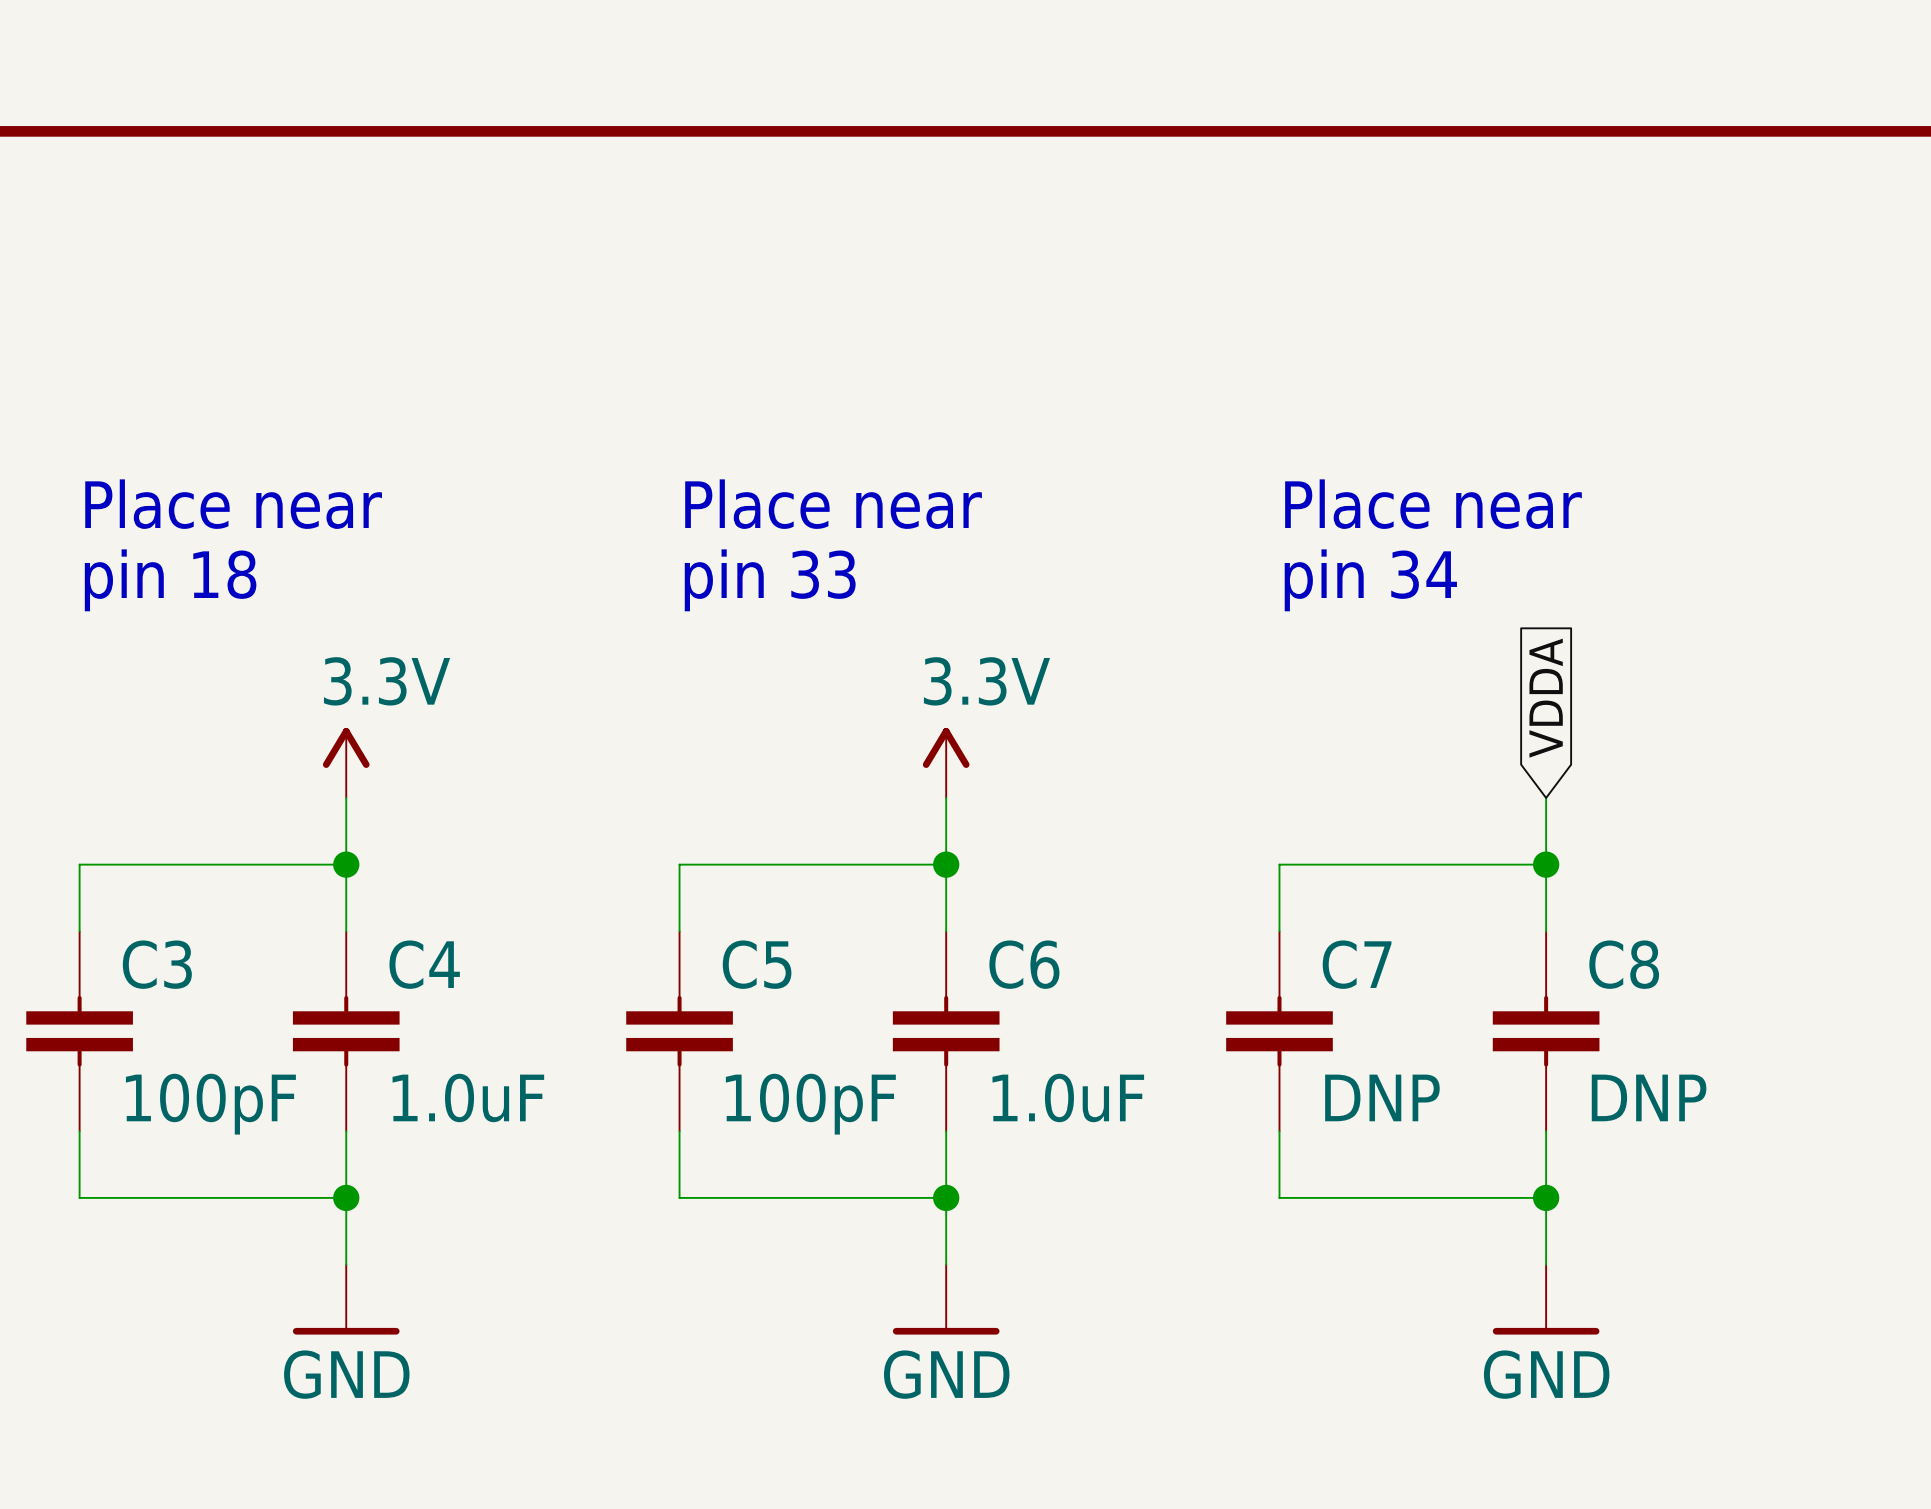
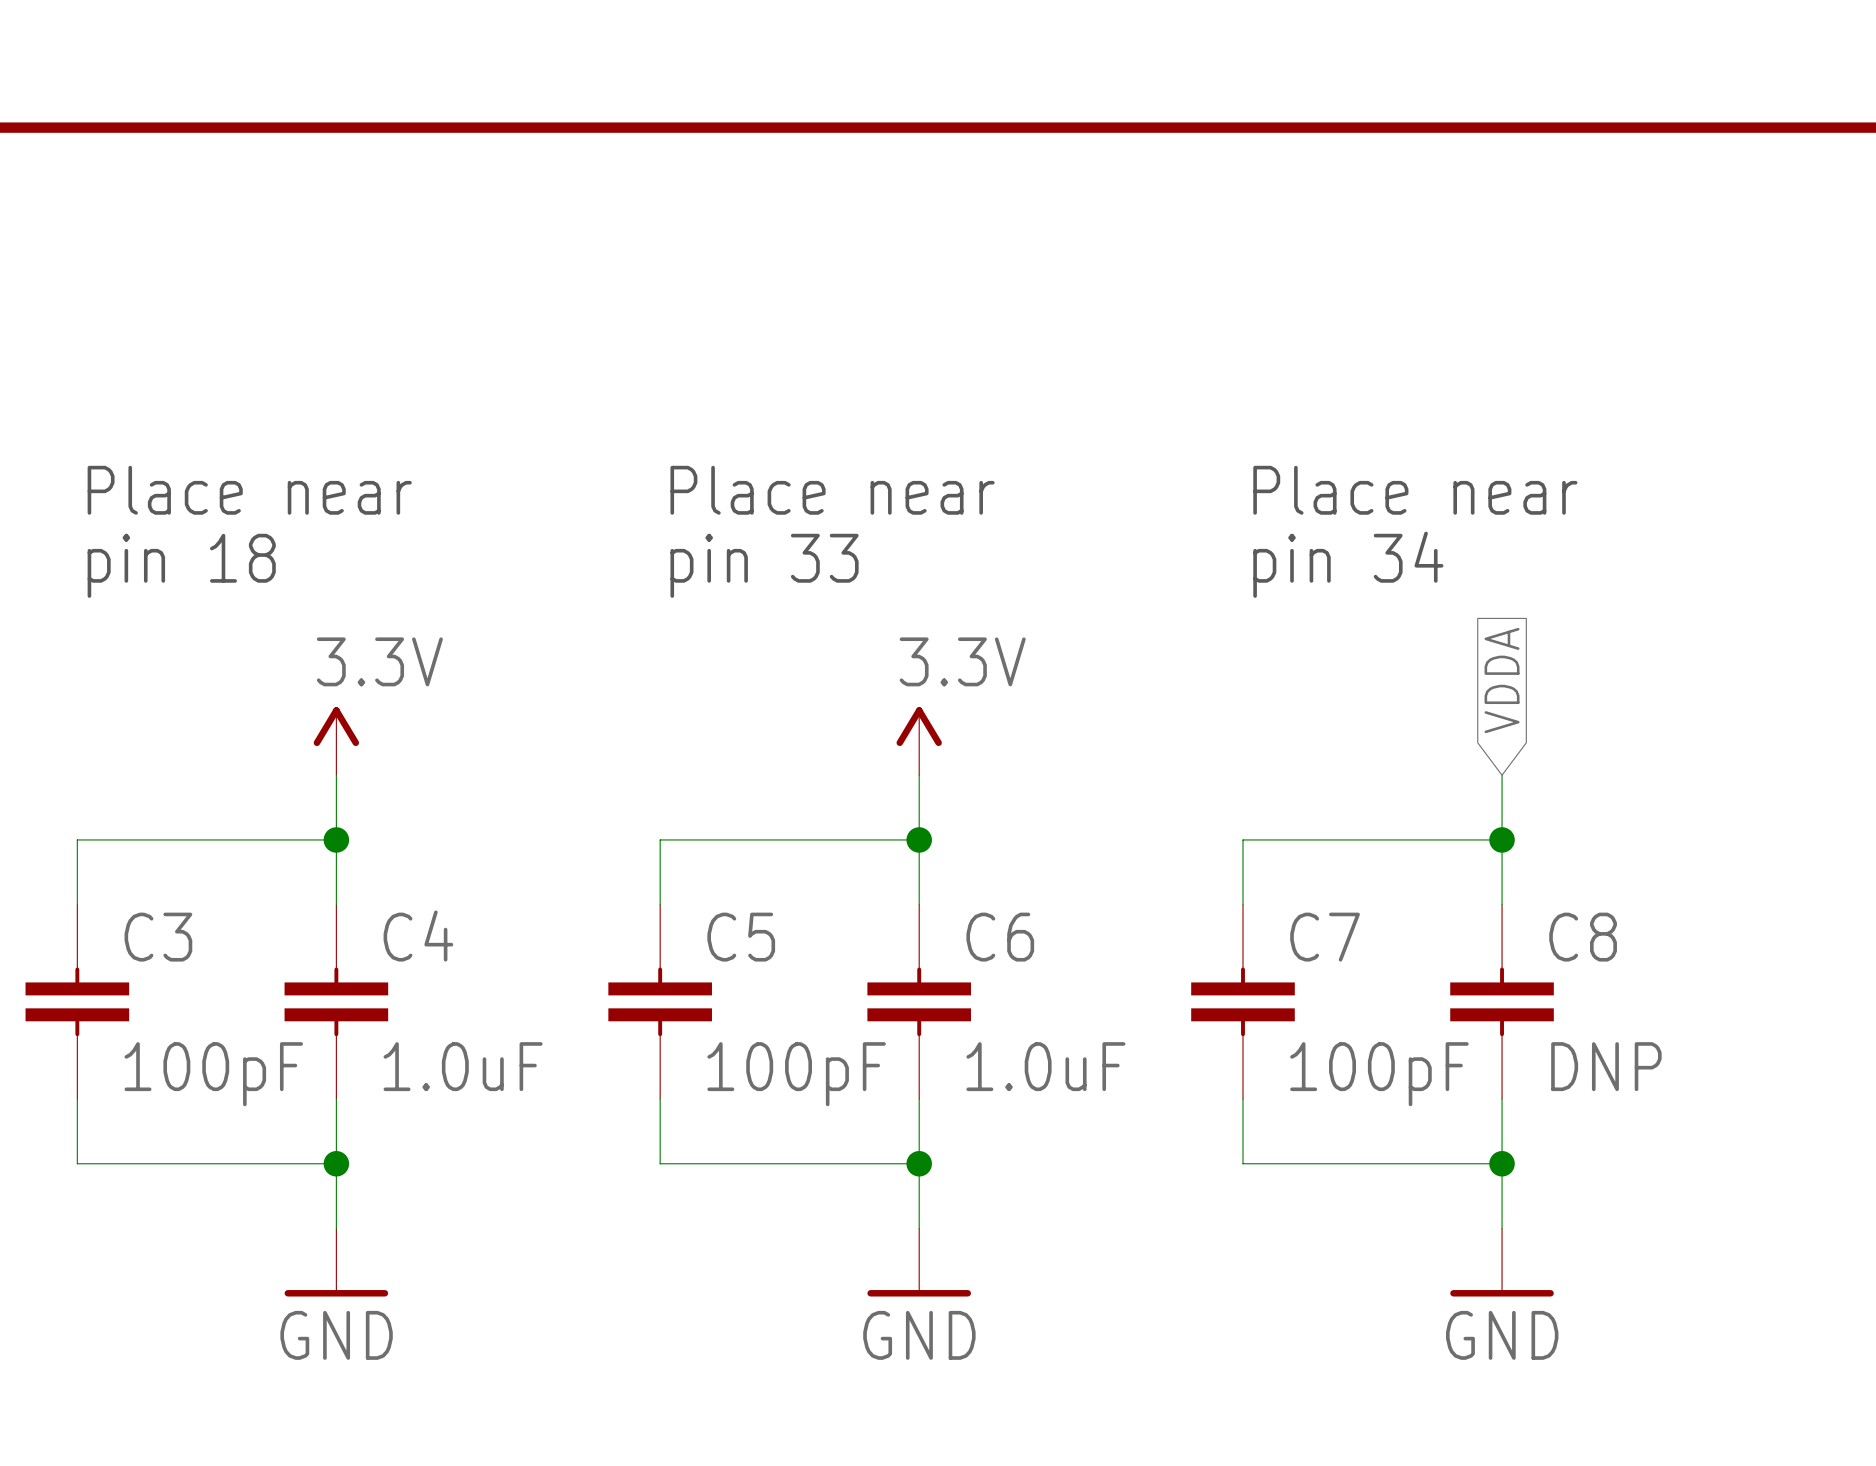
C7 value: DNP (1382, 1097) -> 100pF (1379, 1074)

